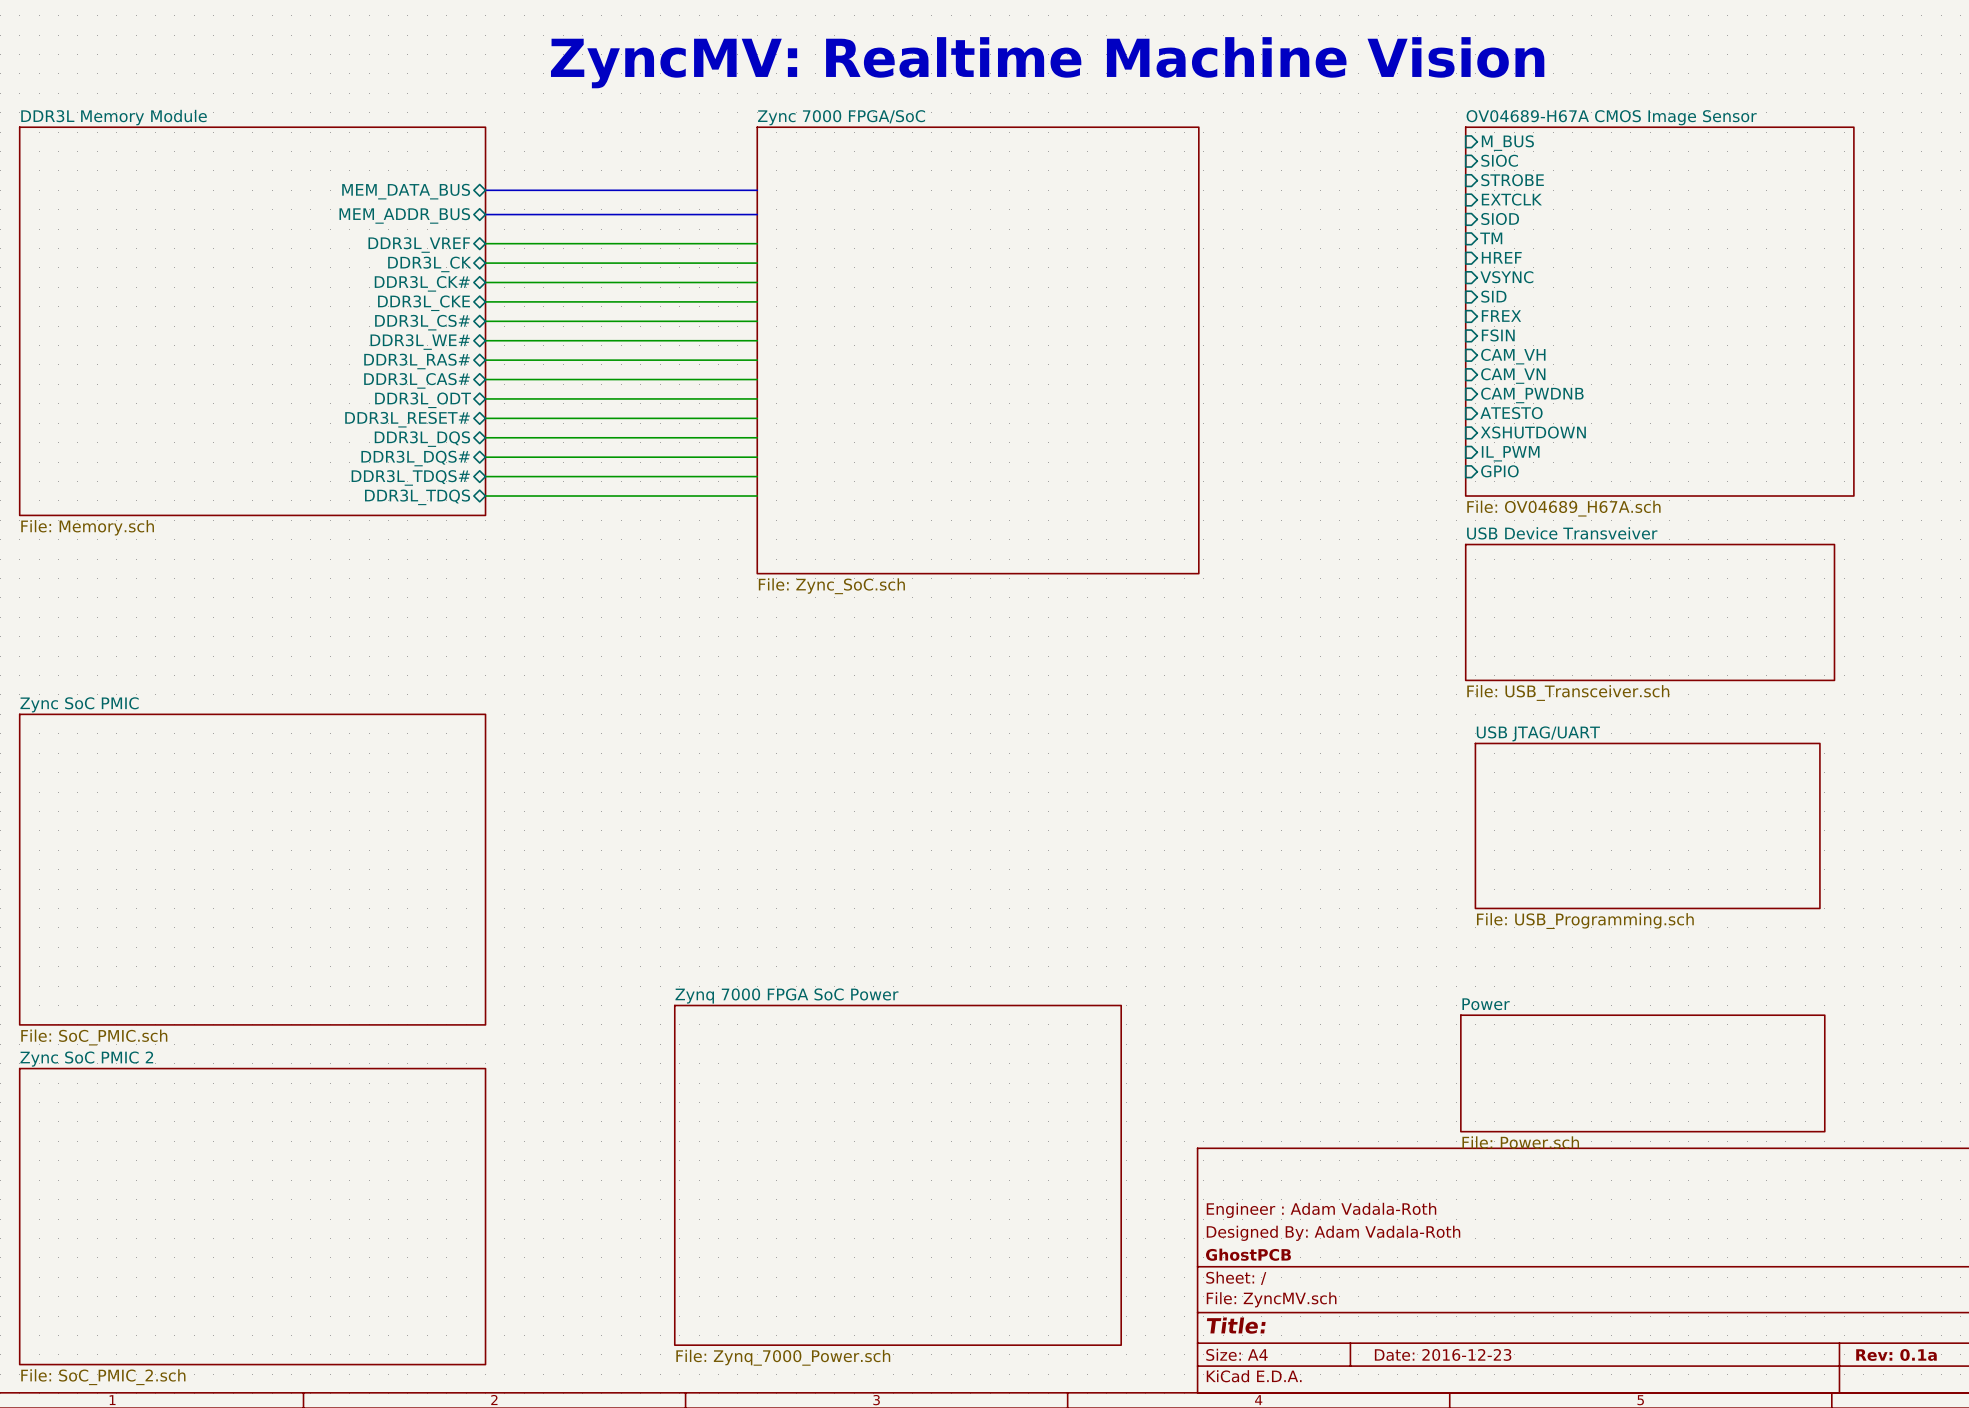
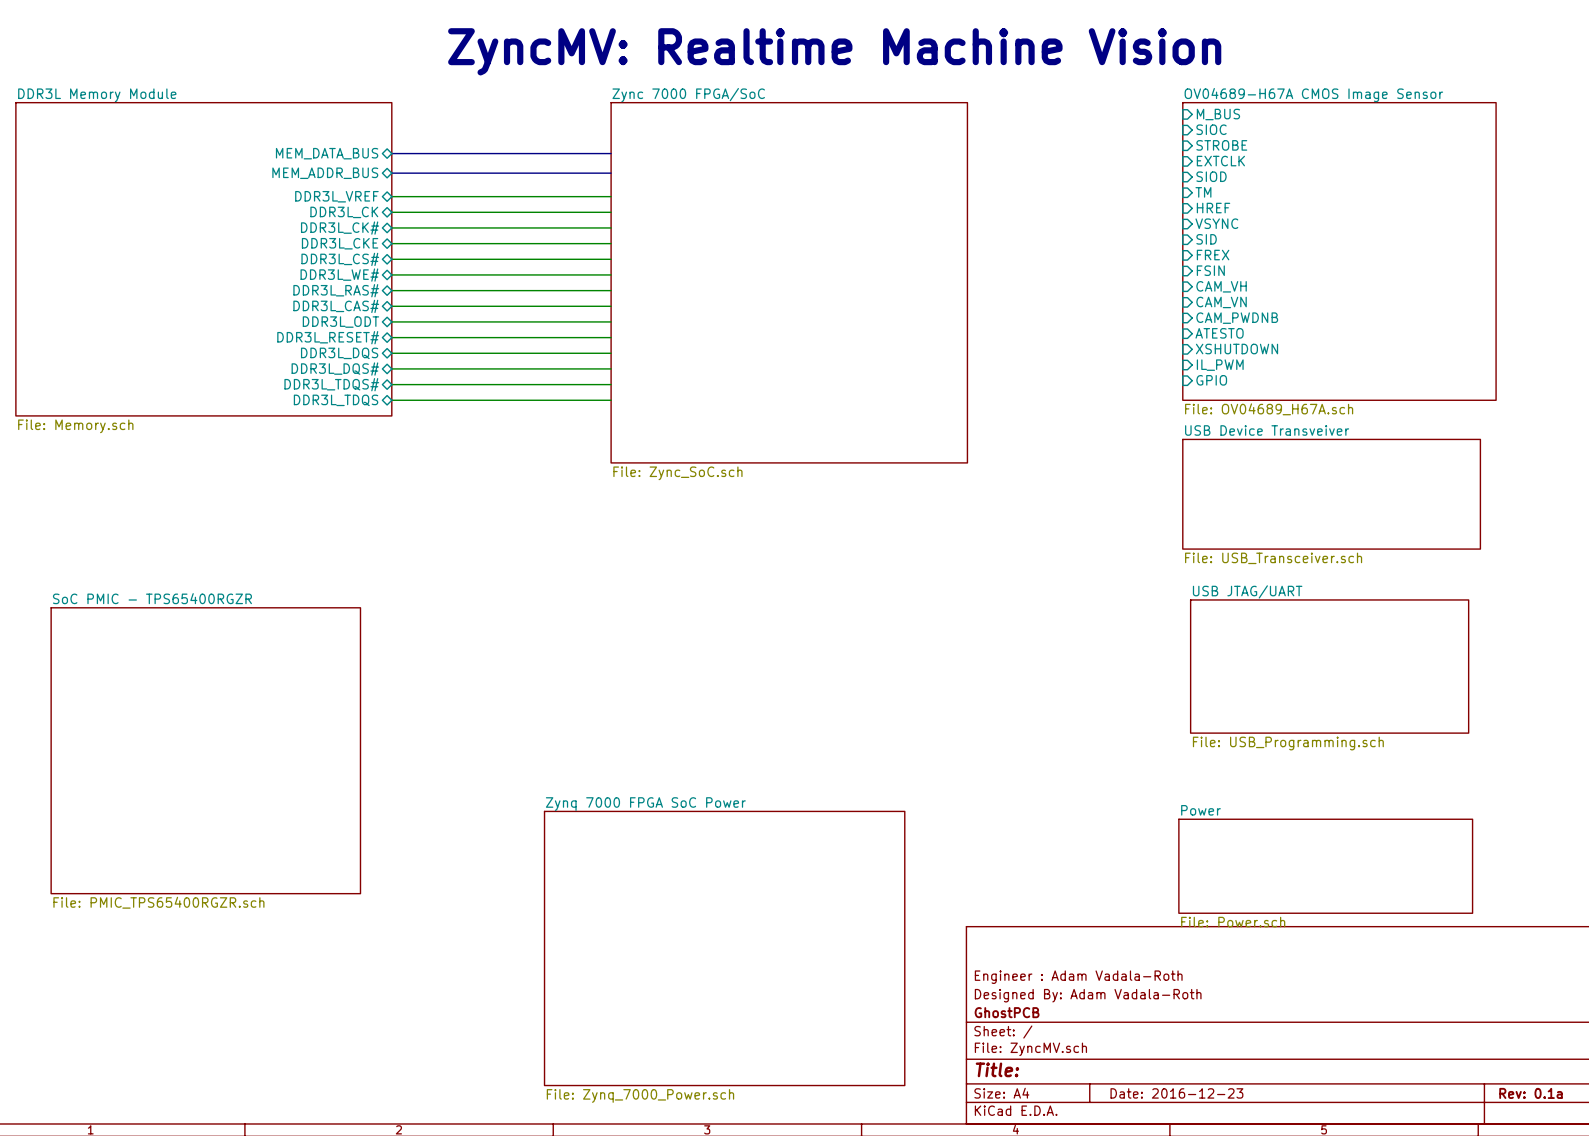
sheet Zync SoC PMIC: File: SoC_PMIC.sch (252, 869) -> none
sheet SoC PMIC - TPS65400RGZR: none -> File: PMIC_TPS65400RGZR.sch (205, 750)
sheet Zync SoC PMIC 2: File: SoC_PMIC_2.sch (252, 1216) -> none

